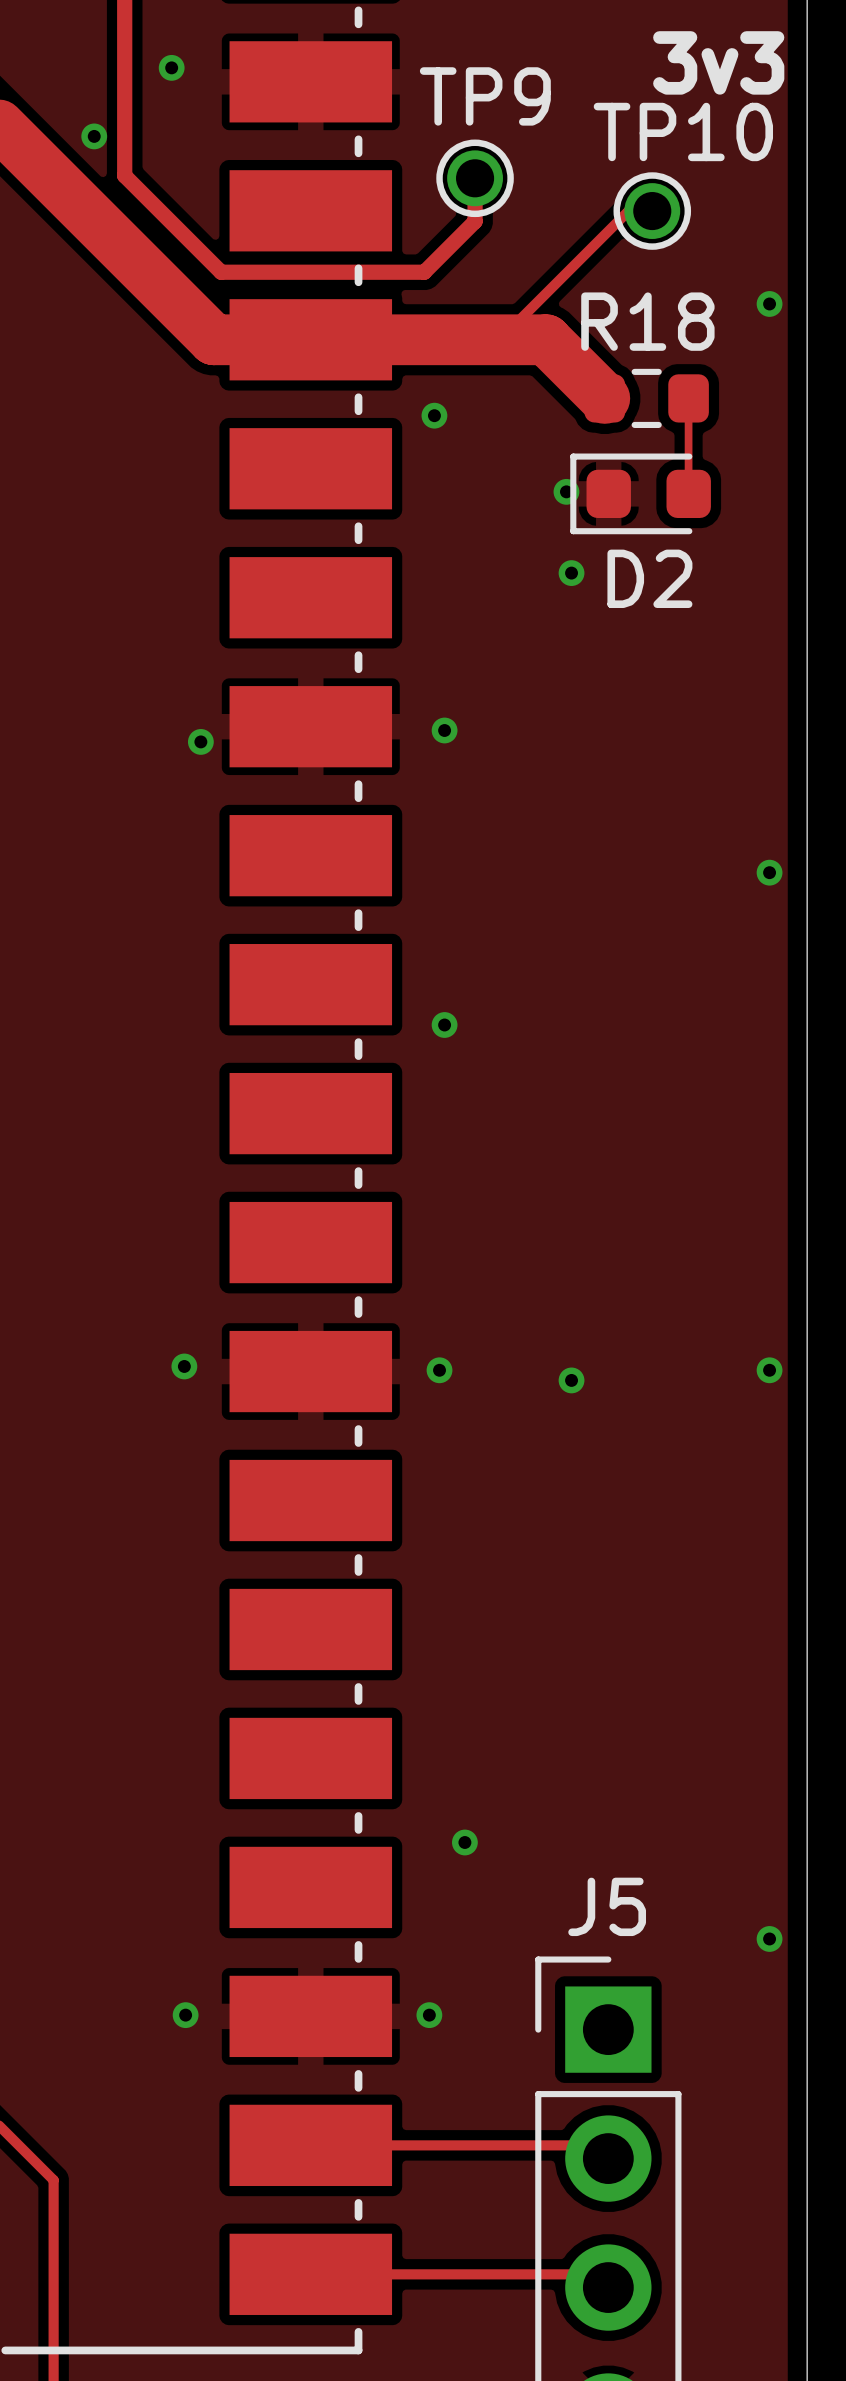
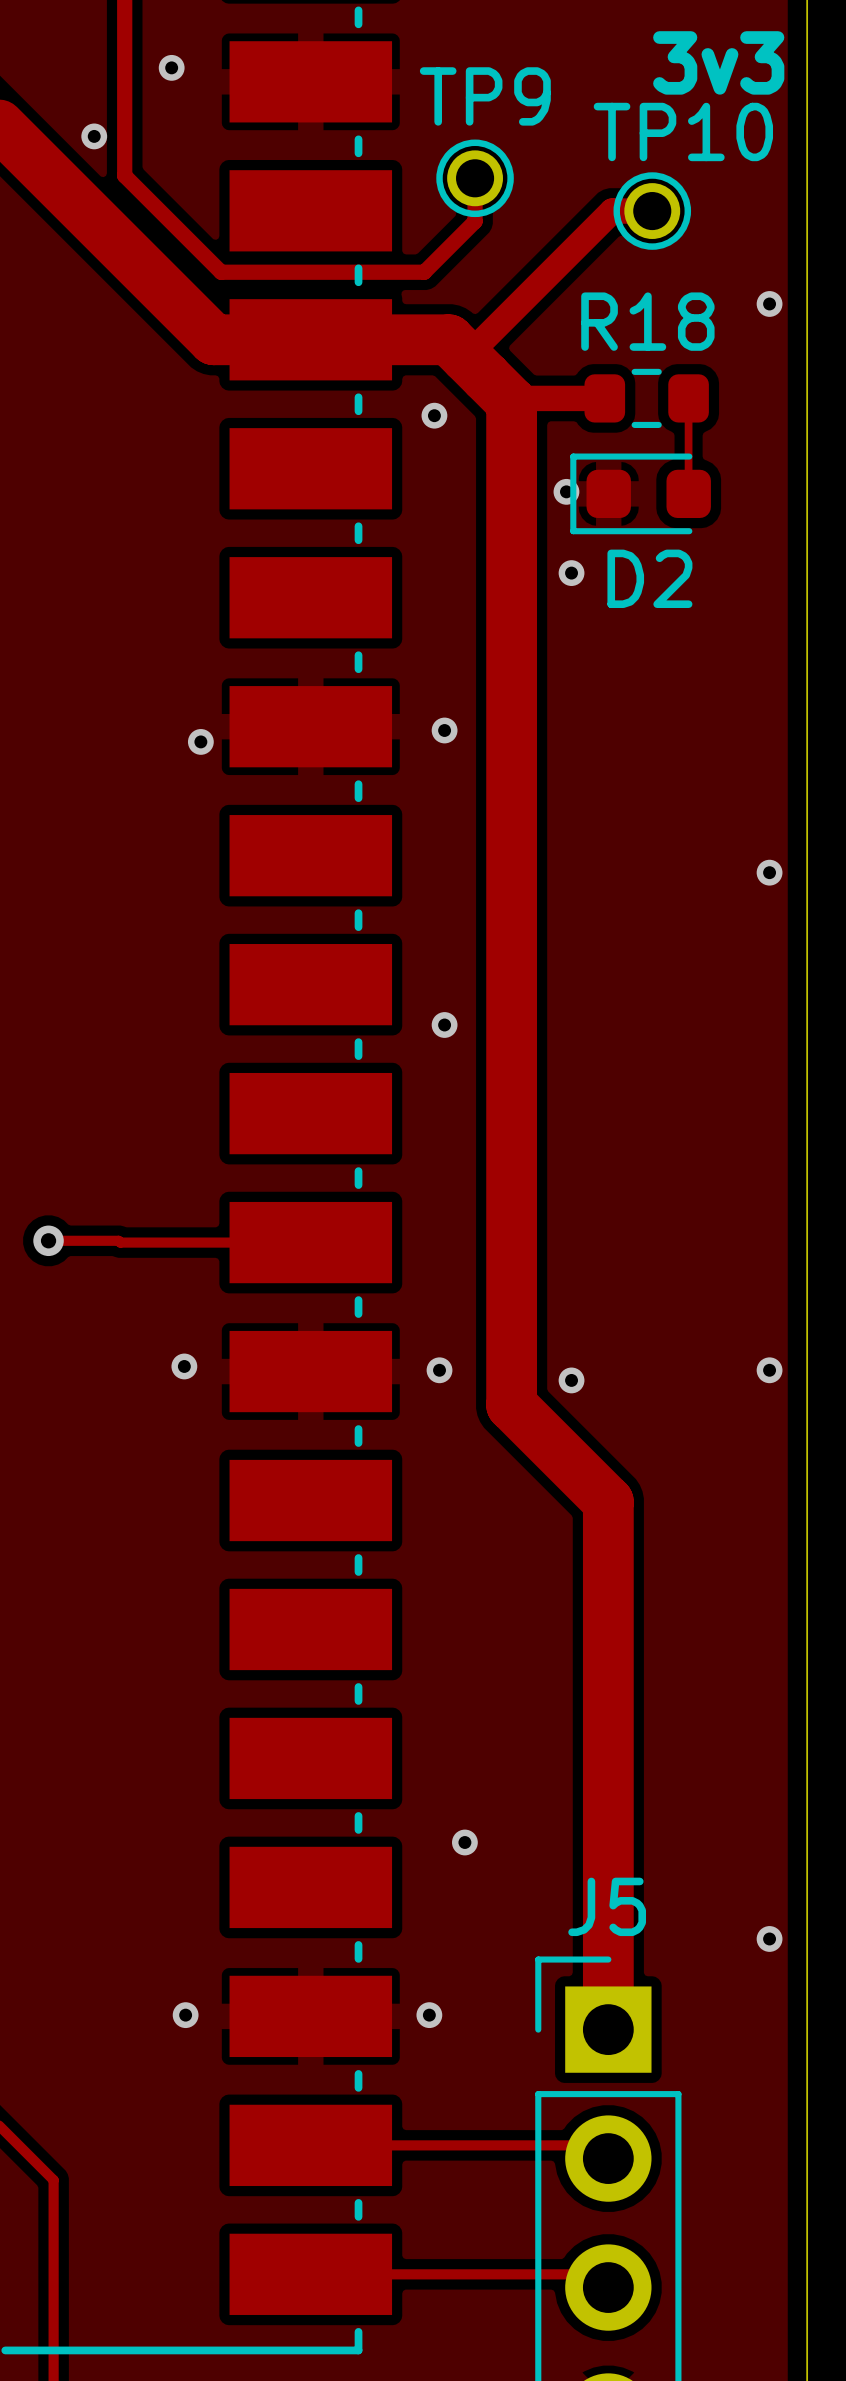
track: (628, 211) (501, 338) -> (628, 211) (612, 211) (466, 357)
track: (448, 339) (546, 339) (604, 398) -> (448, 339) (511, 402) (511, 1405) (608, 1501) (608, 2029)
track: none -> (515, 398) (596, 398)
track: none -> (48, 1240) (310, 1242)
via: none -> (48, 1240)

